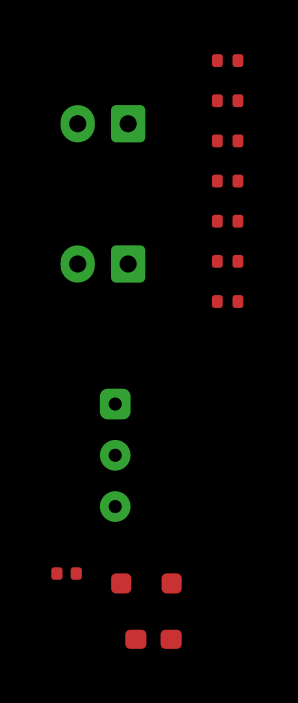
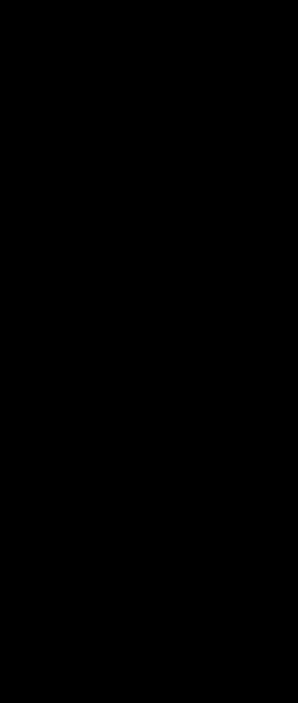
part: (227, 60) -> none
part: (227, 100) -> none
part: (102, 123) -> none
part: (227, 140) -> none
part: (227, 181) -> none
part: (227, 221) -> none
part: (227, 261) -> none
part: (102, 263) -> none
part: (227, 301) -> none
part: (115, 455) -> none
part: (66, 573) -> none
part: (146, 583) -> none
part: (153, 639) -> none

